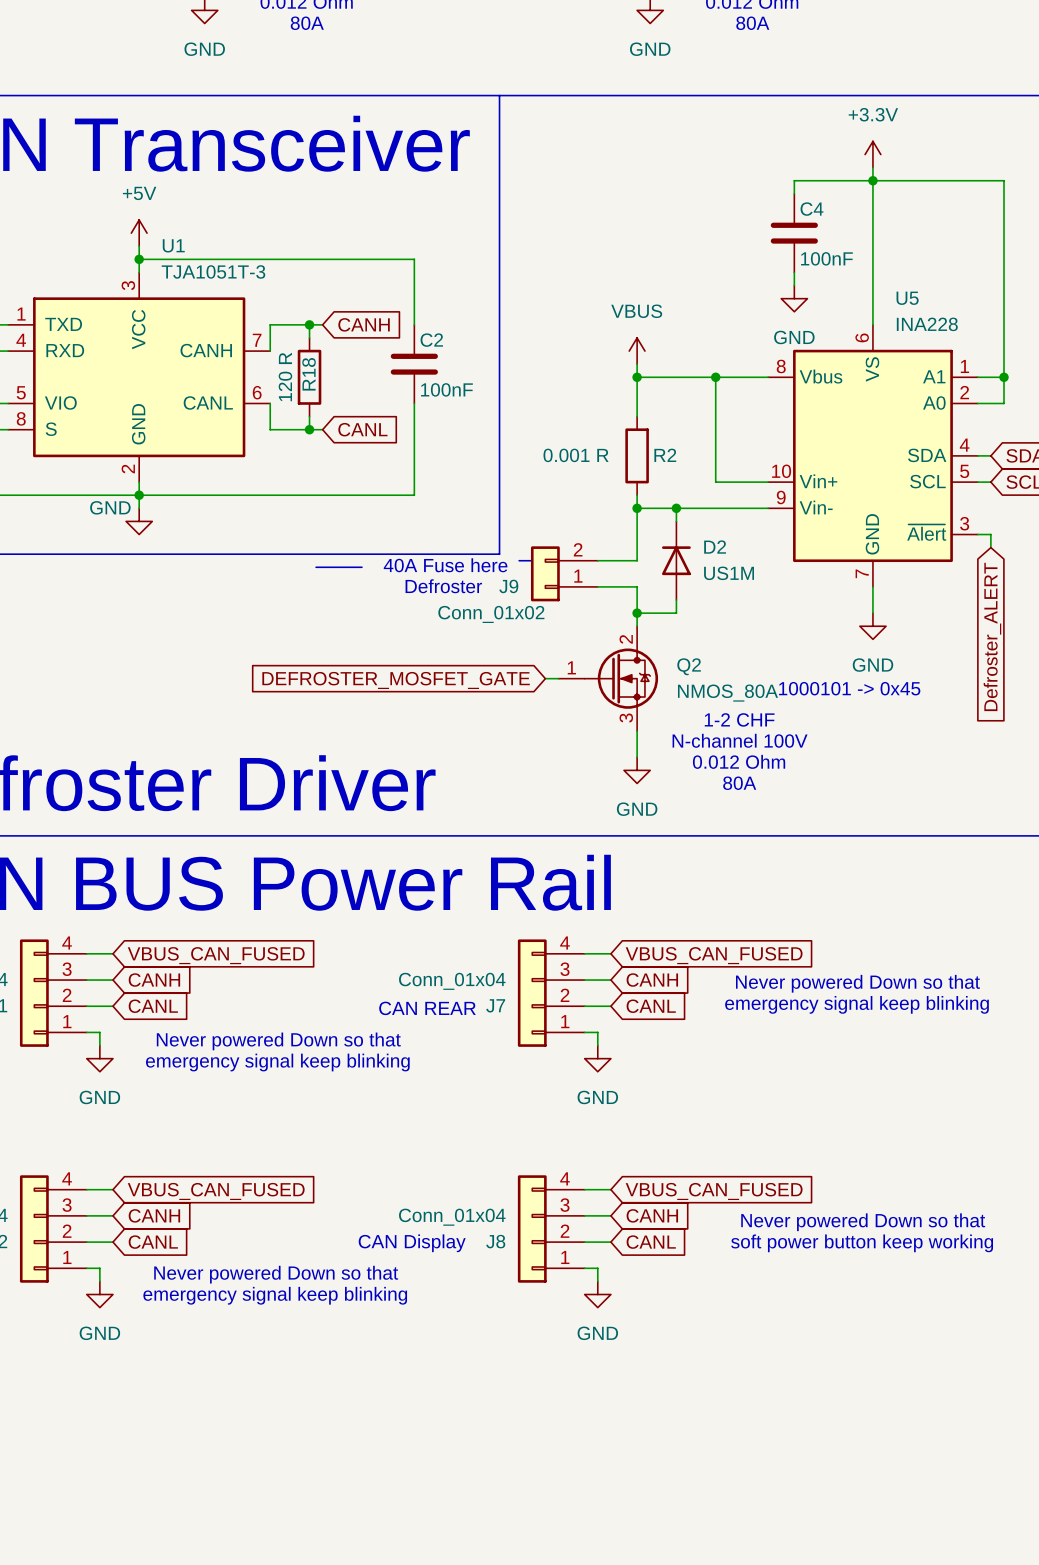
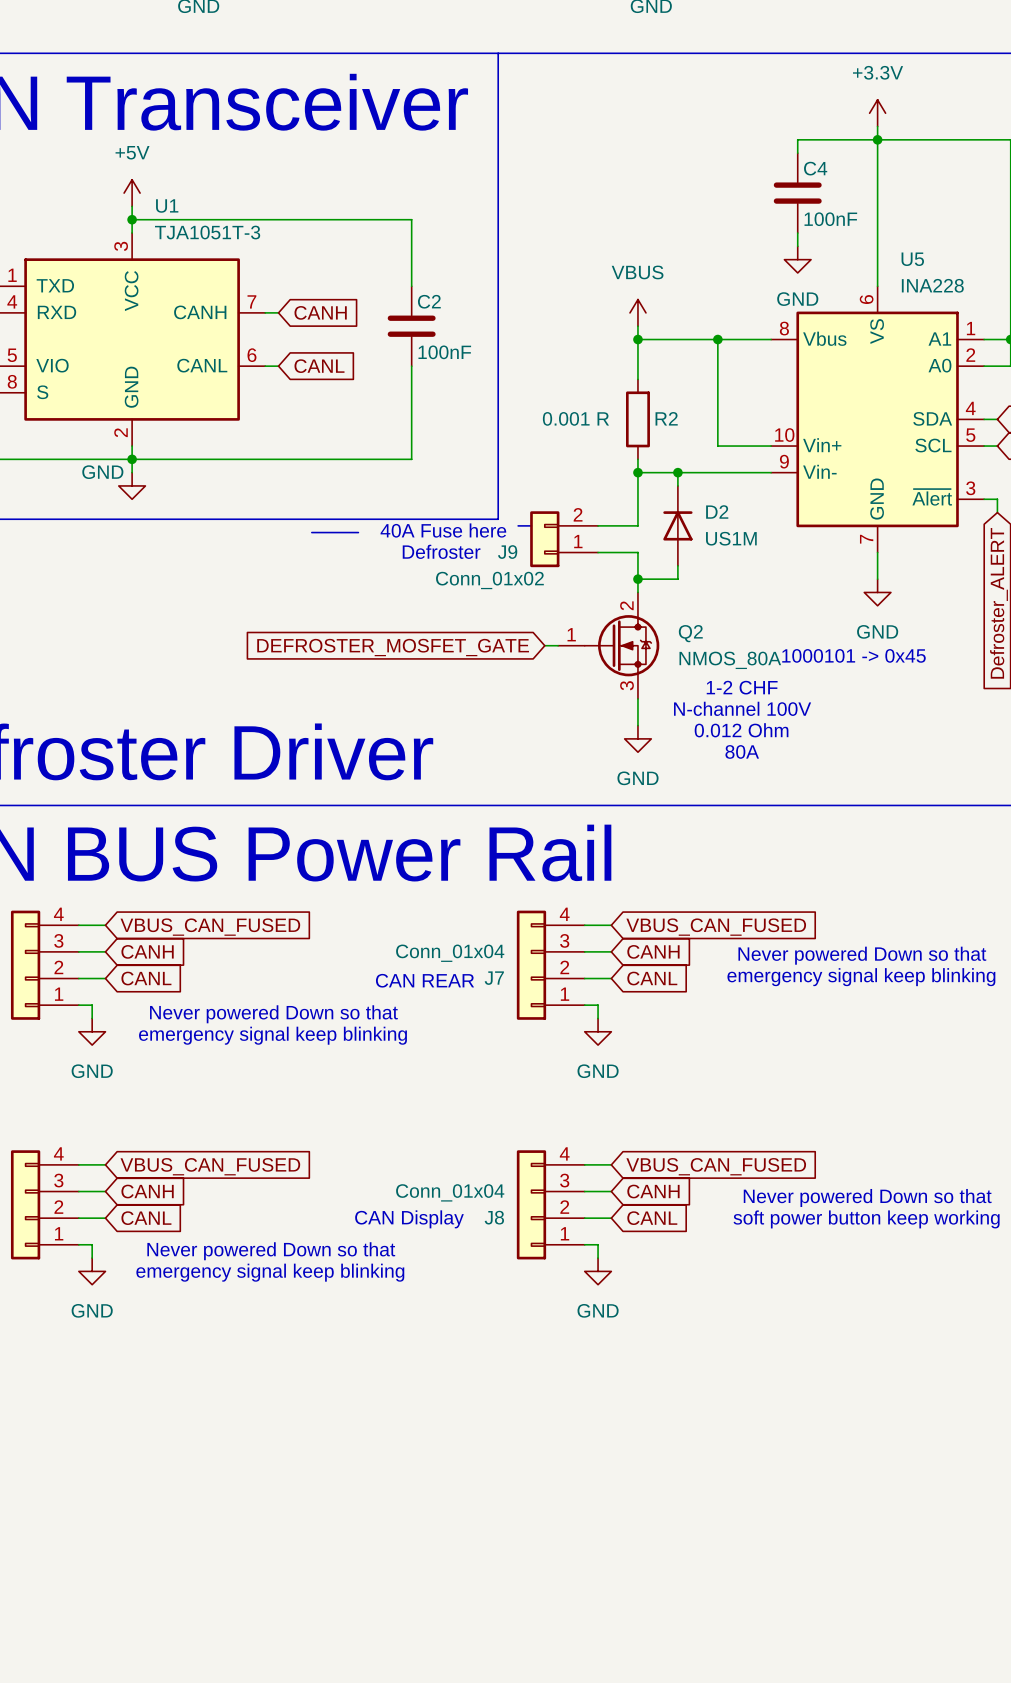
wire: (309, 324) (309, 337) -> none
junction: (309, 324) -> none
wire: (322, 324) (270, 324) (270, 351) -> (278, 312) (265, 312)
global label position: CANH (364, 324) -> CANH (320, 312)
R18: 120 R (309, 377) -> none
wire: (270, 403) (270, 429) (322, 429) -> (265, 366) (278, 366)
wire: (309, 416) (309, 429) -> none
junction: (309, 429) -> none
global label position: CANL (362, 429) -> CANL (319, 366)

